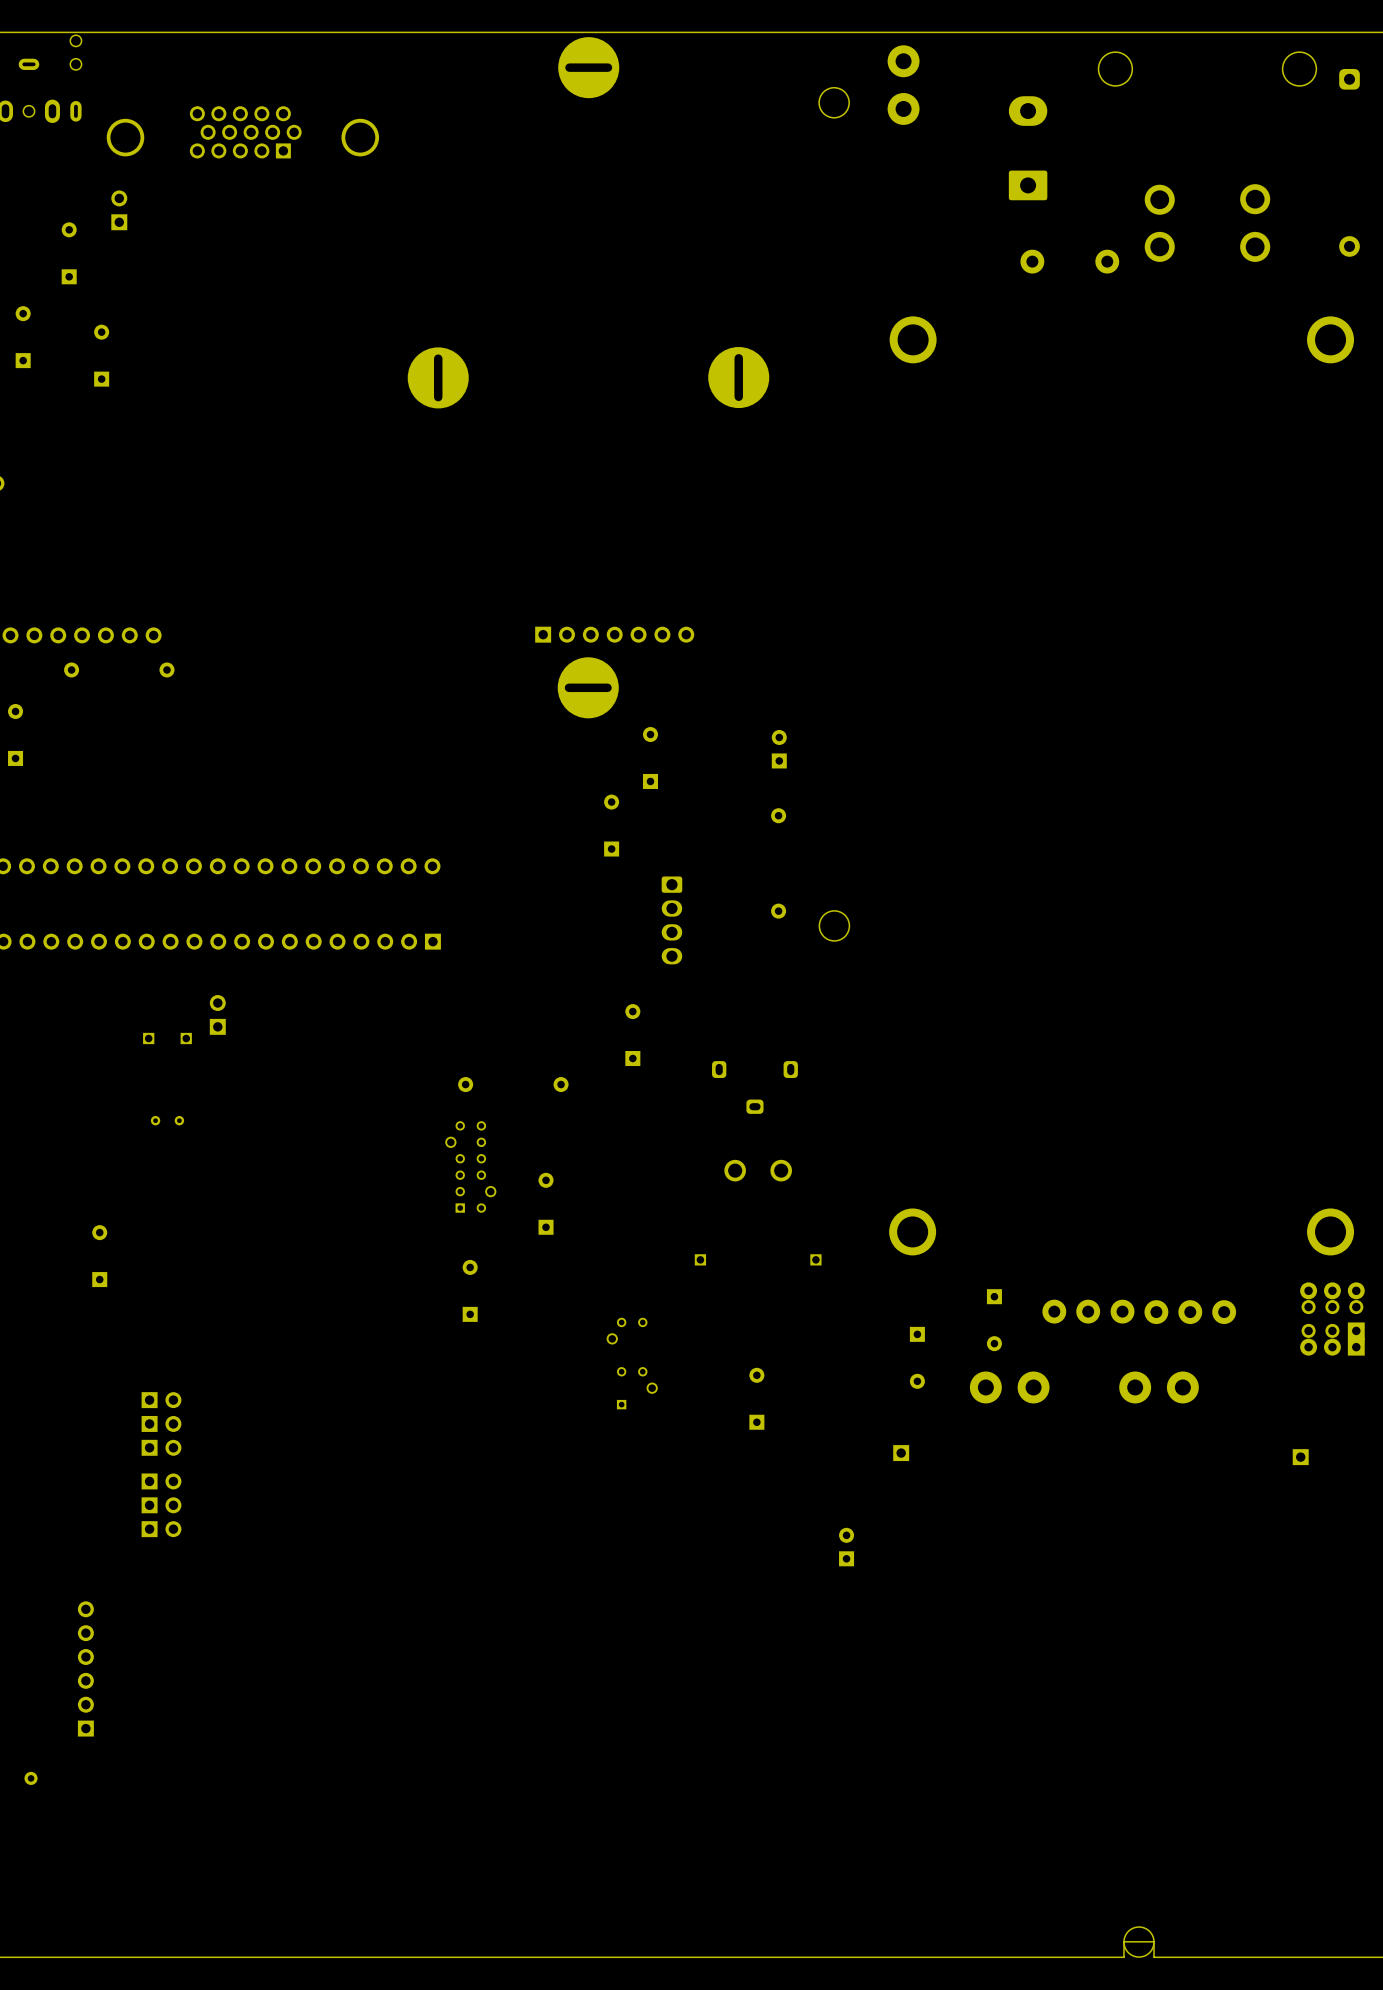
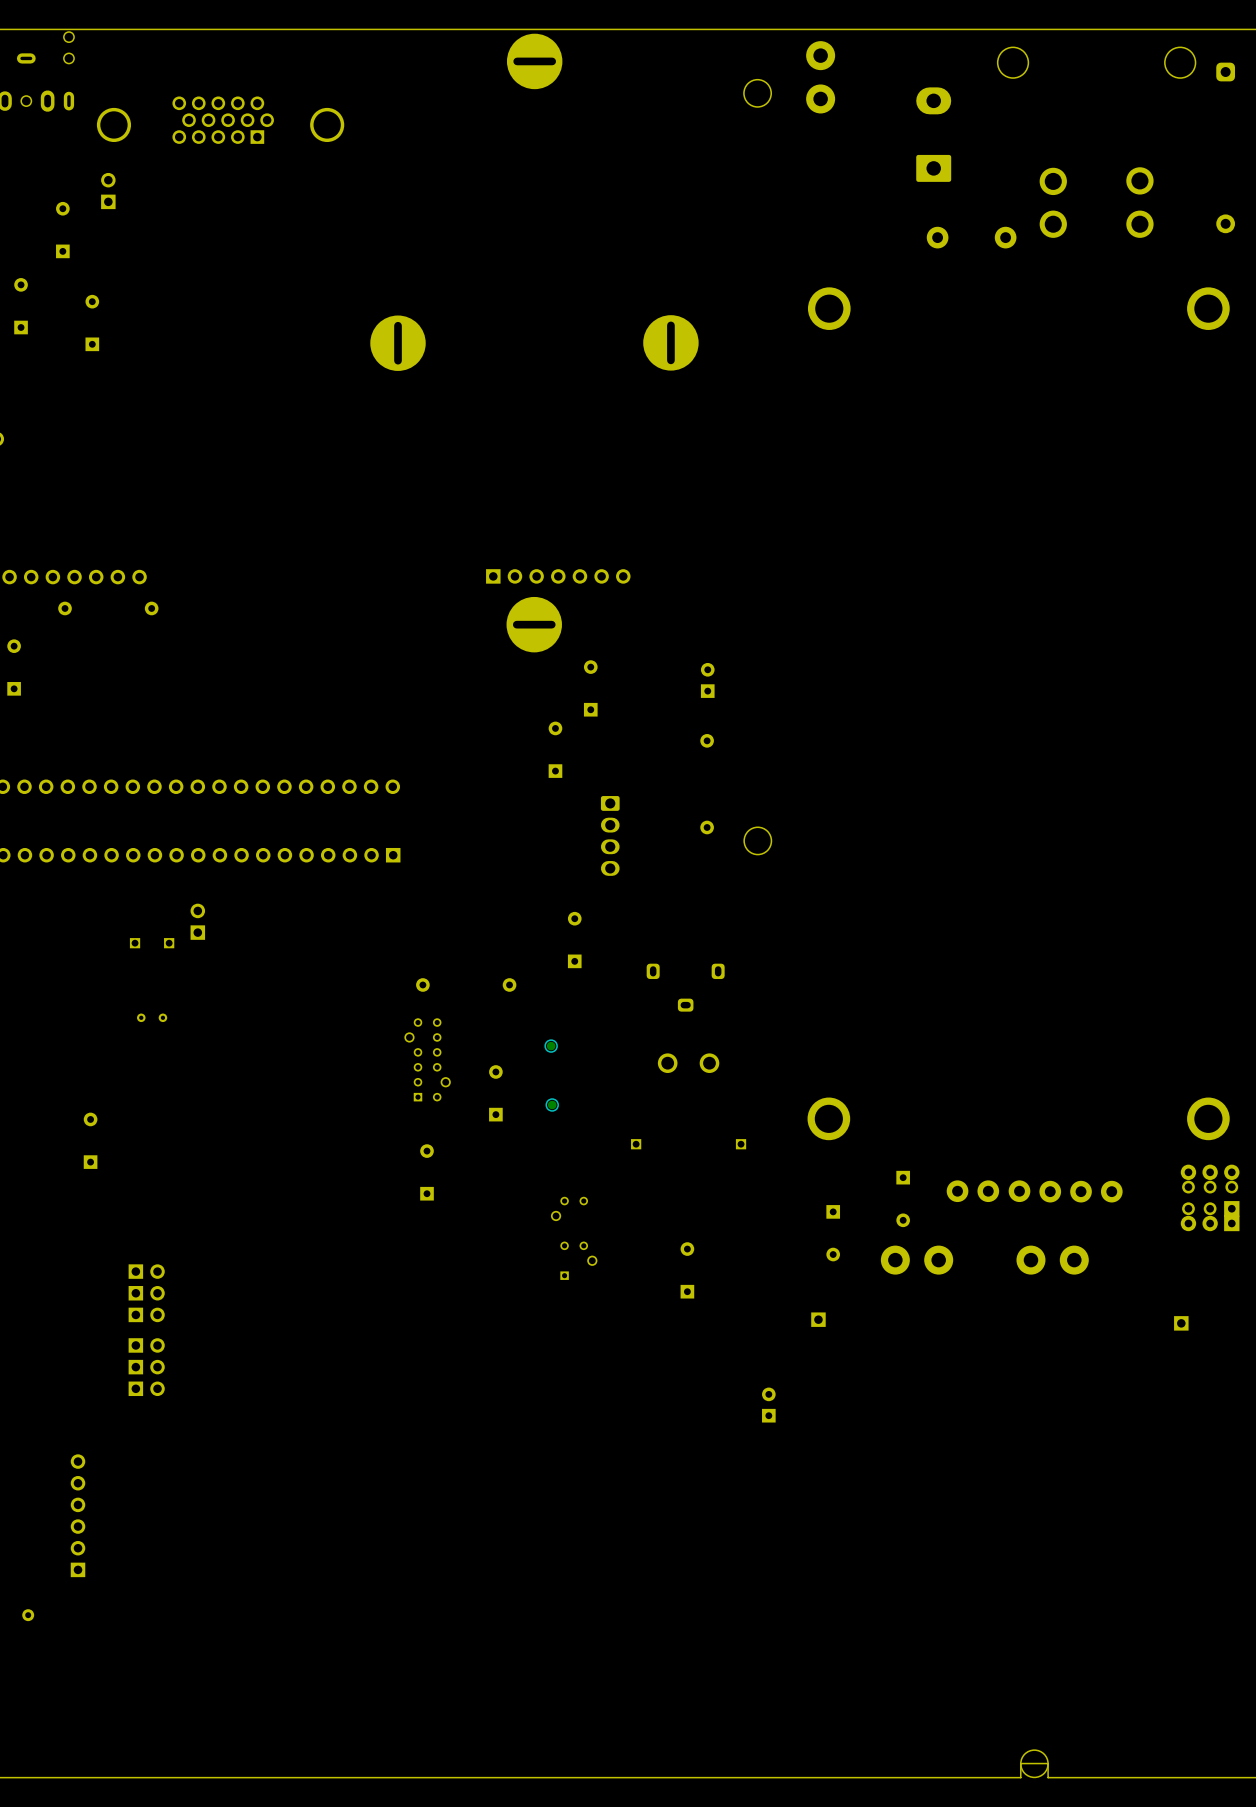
part: none -> (551, 1046)
part: none -> (552, 1104)

